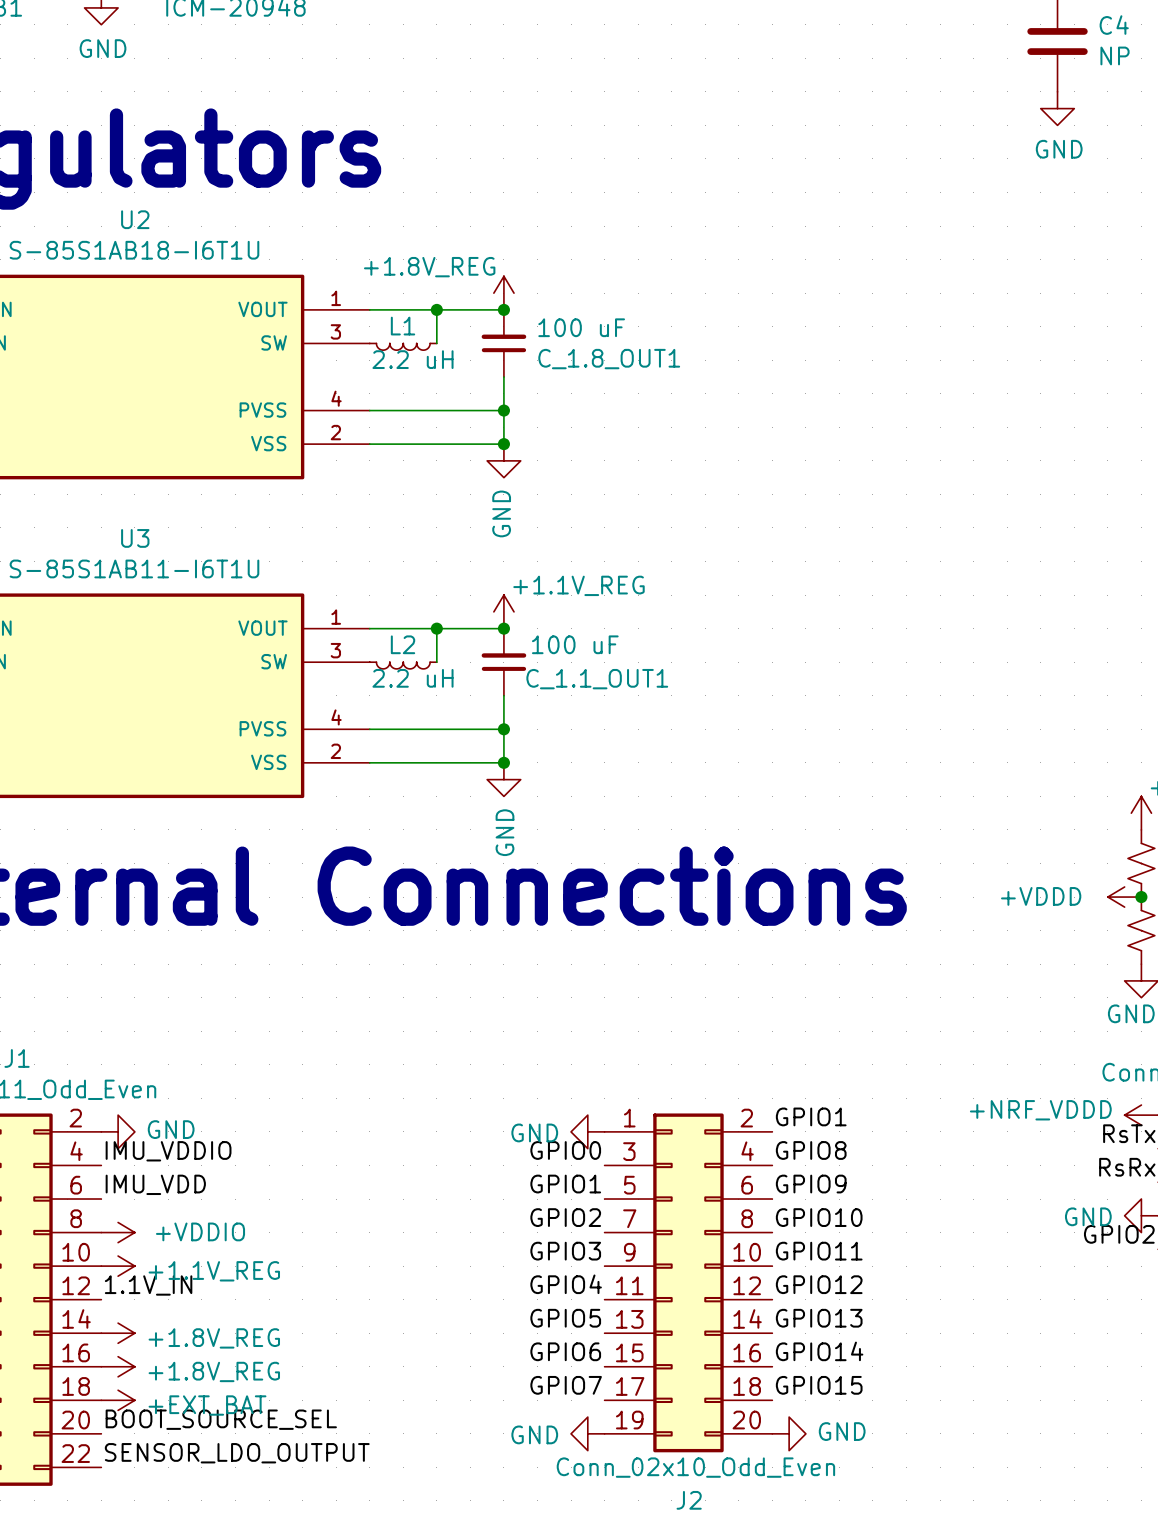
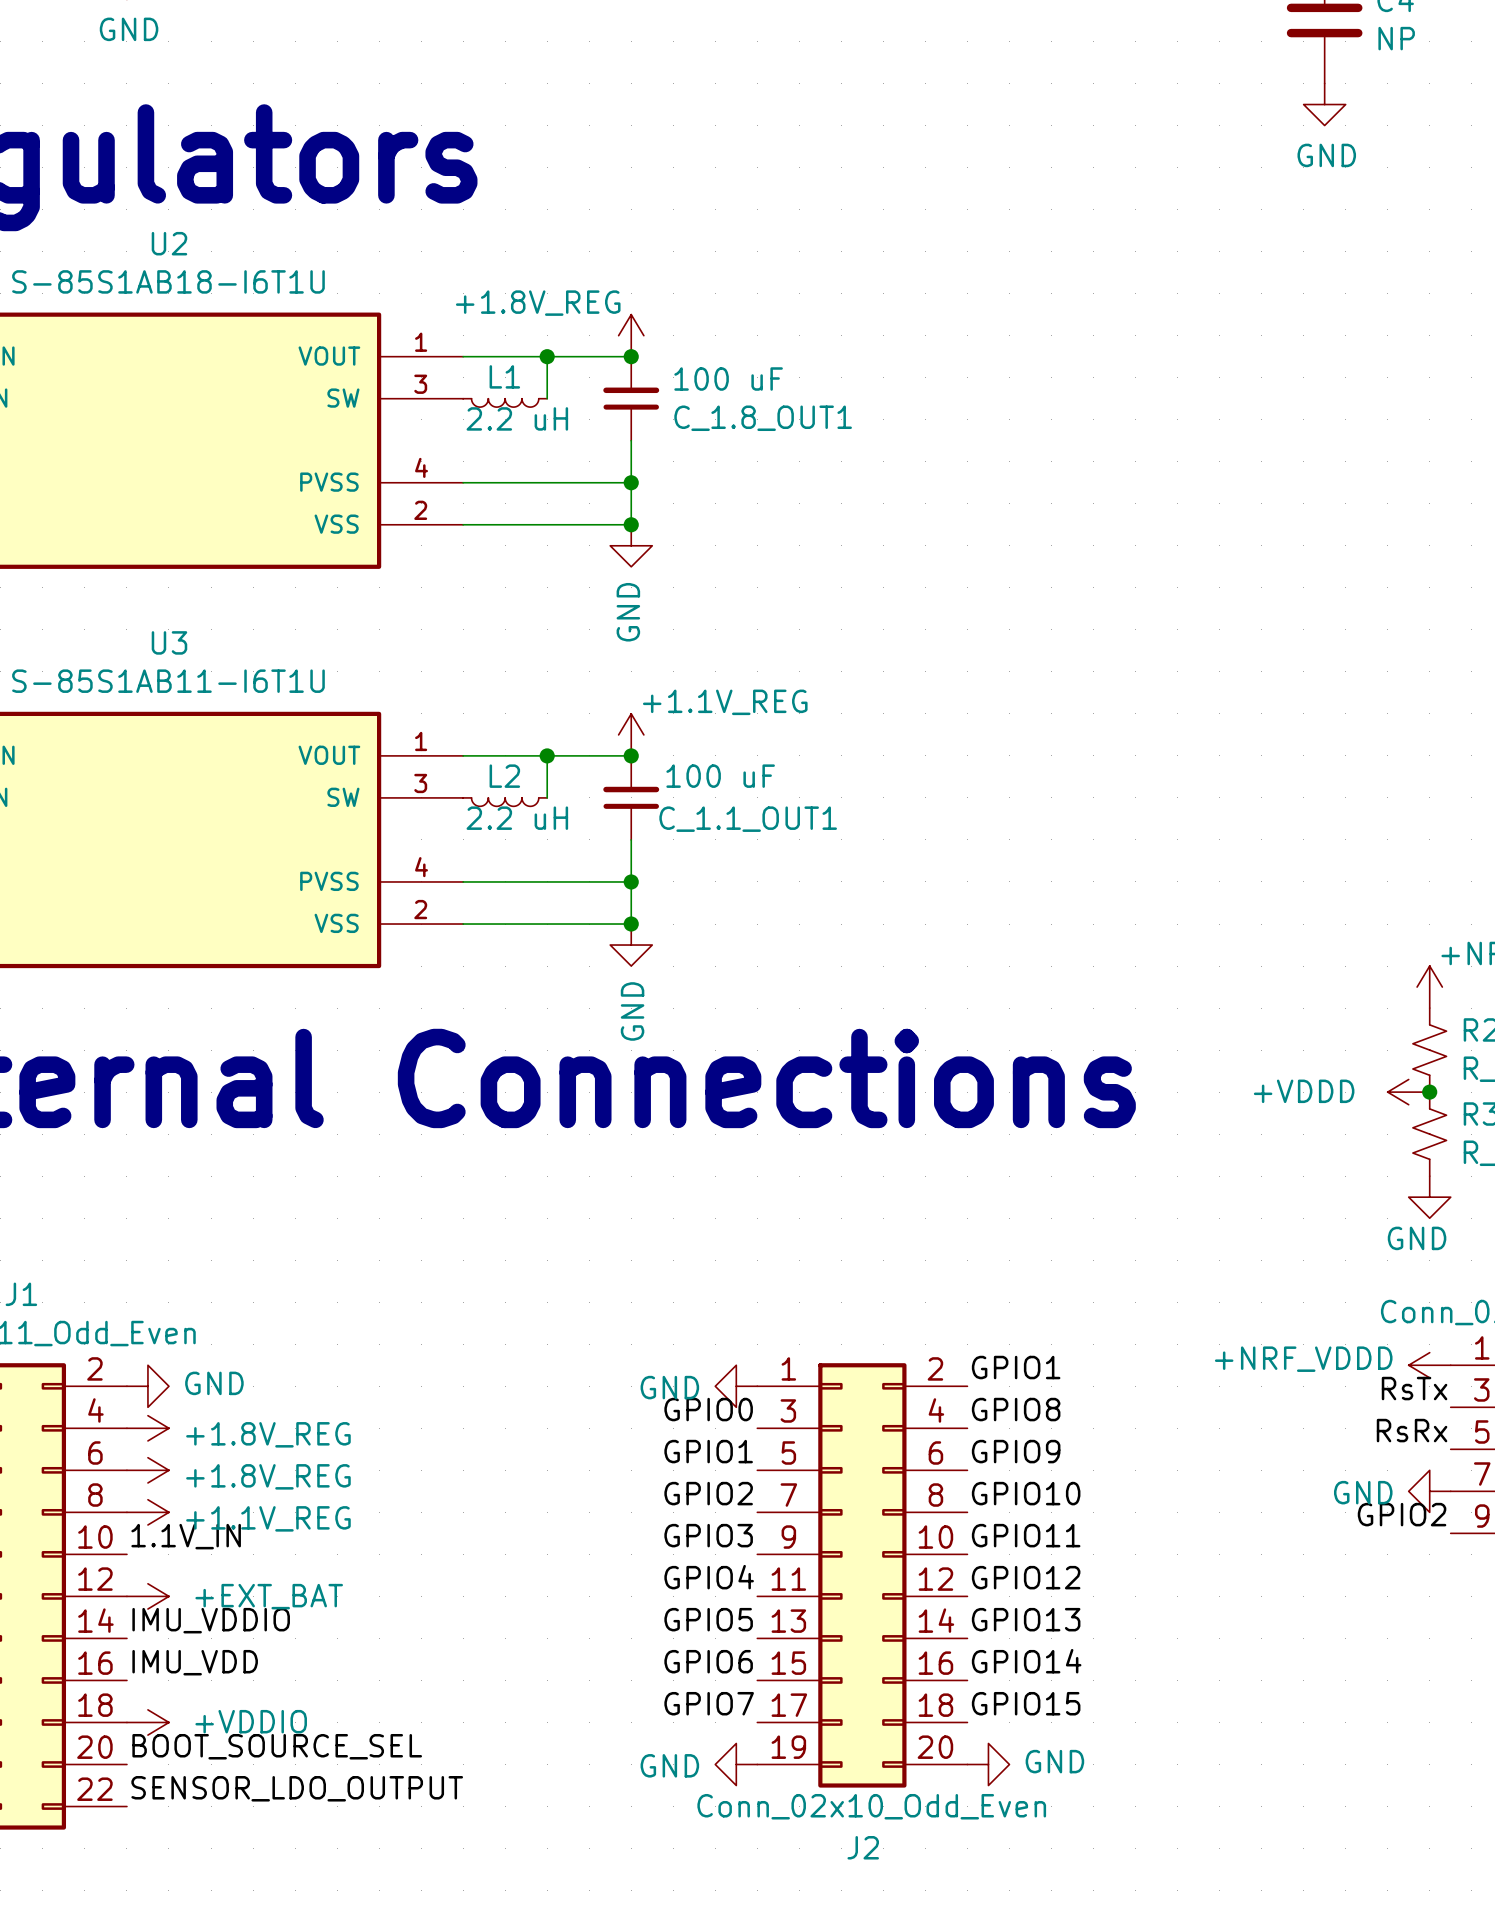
label position: IMU_VDDIO (168, 1151) -> IMU_VDDIO (211, 1620)
power symbol: none -> +1.8V_REG (147, 1428)
label position: IMU_VDD (155, 1184) -> IMU_VDD (195, 1662)
power symbol: none -> +1.8V_REG (147, 1470)
power symbol: +VDDIO (118, 1232) -> +1.1V_REG (147, 1512)
power symbol: +1.1V_REG (118, 1266) -> none
label position: 1.1V_IN (148, 1285) -> 1.1V_IN (186, 1536)
power symbol: none -> +EXT_BAT (147, 1596)
power symbol: +1.8V_REG (118, 1333) -> none
power symbol: +1.8V_REG (118, 1366) -> none
power symbol: +EXT_BAT (118, 1400) -> +VDDIO (147, 1722)

